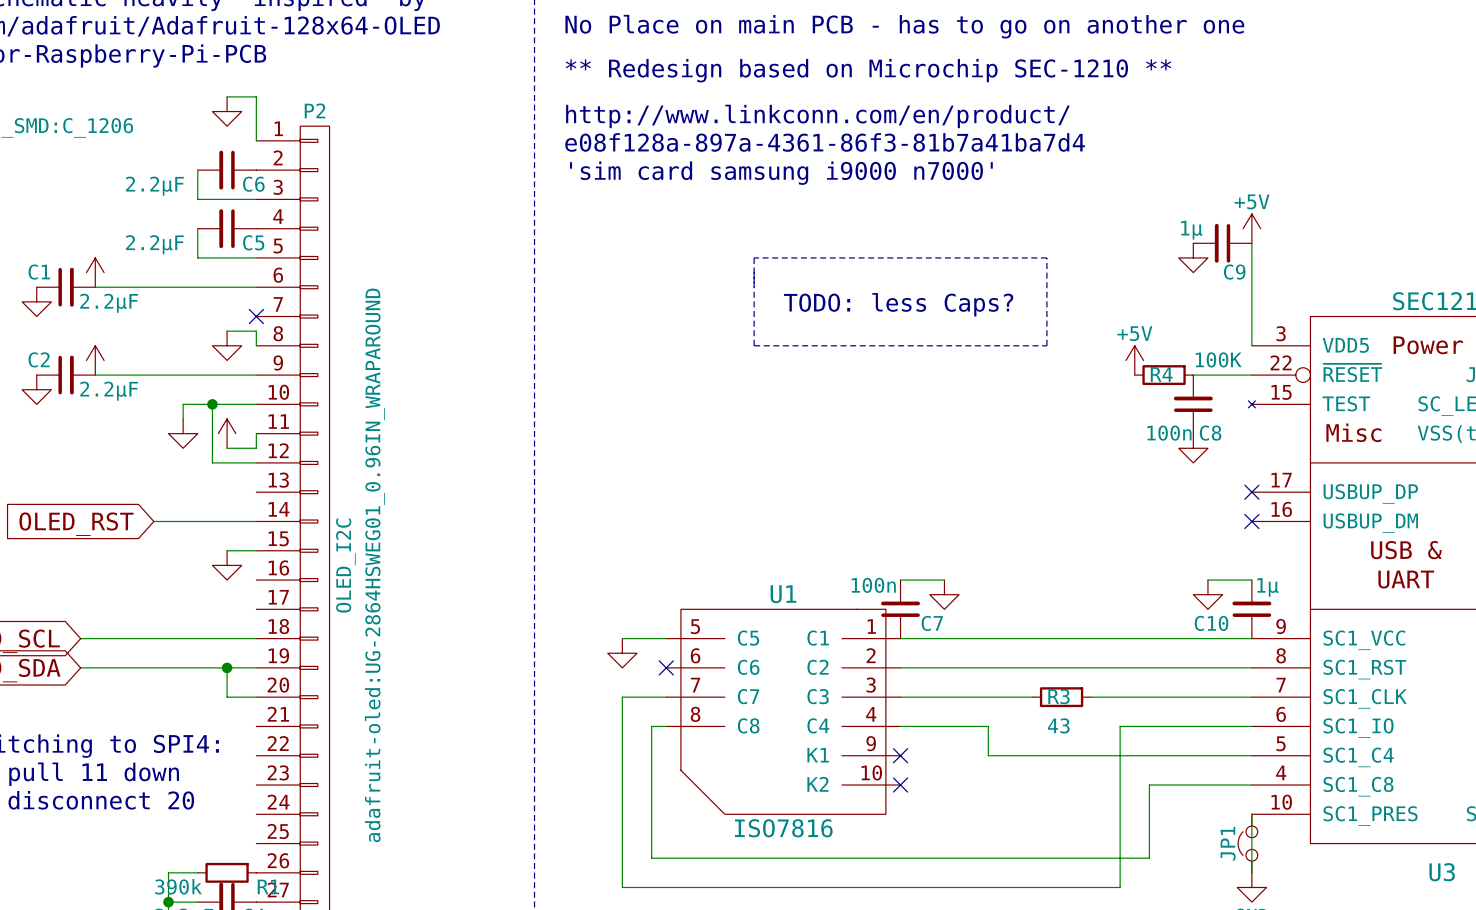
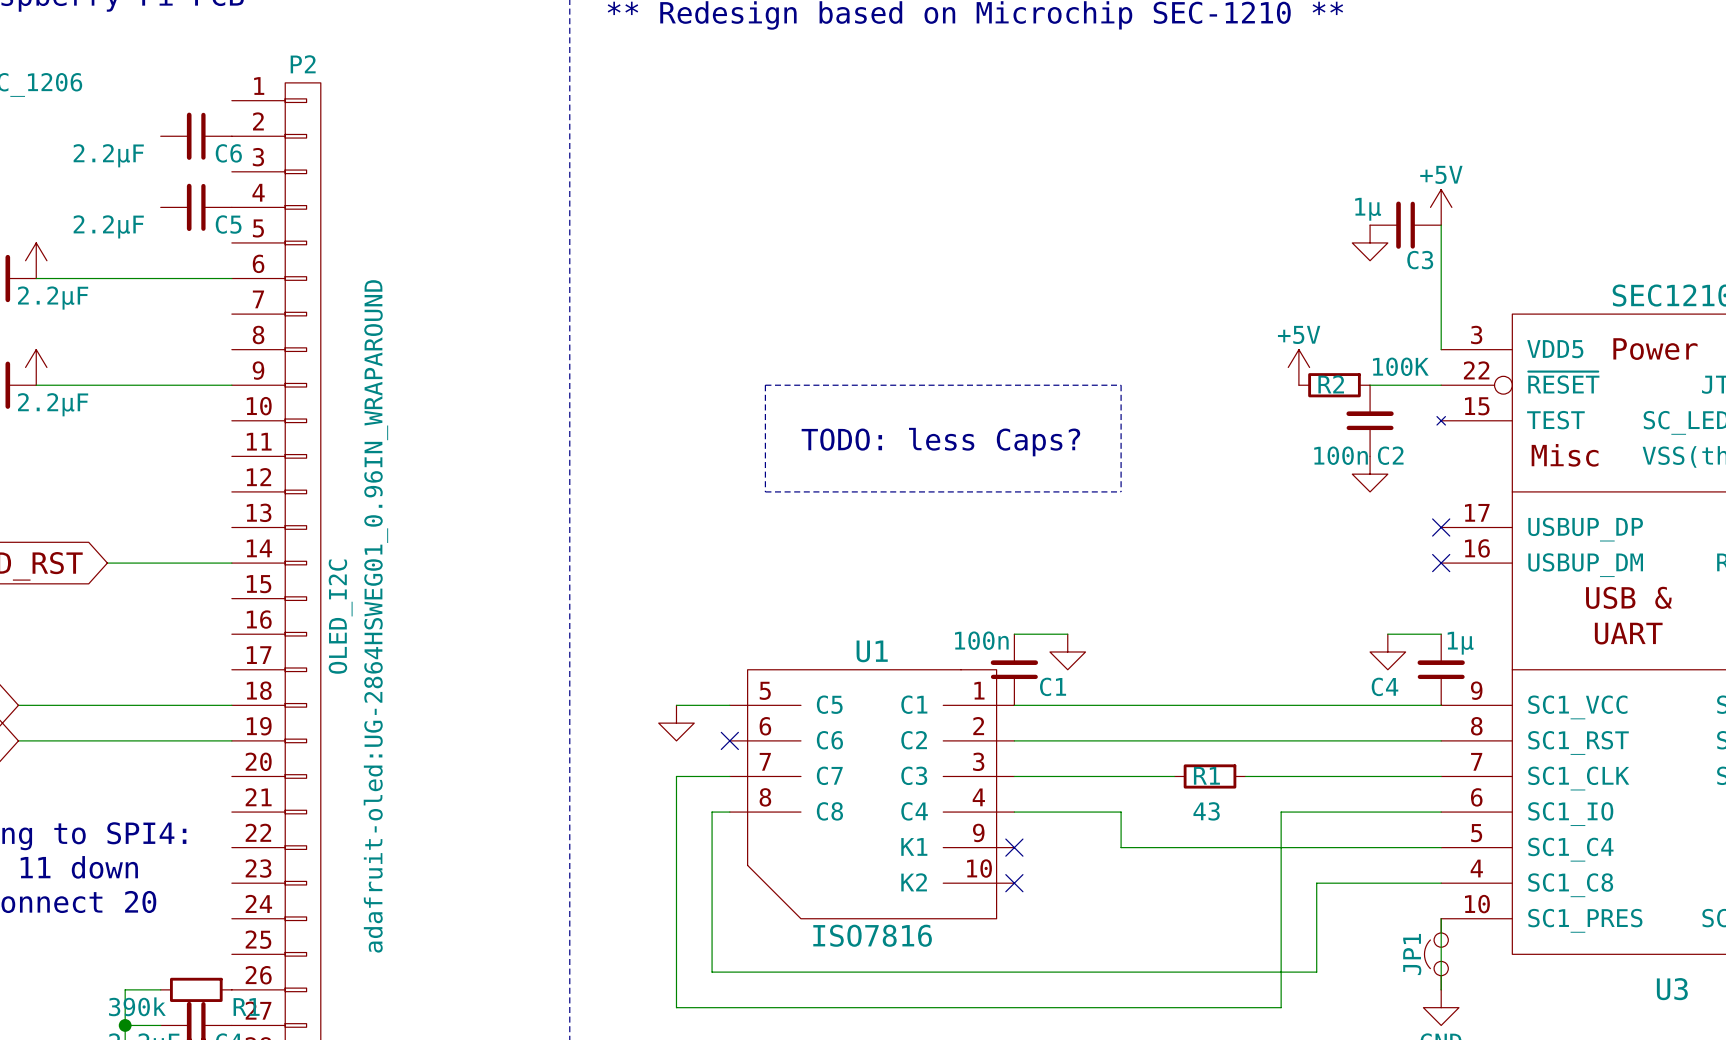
wire: (227, 96) (256, 96) (256, 140) -> none
power symbol: (227, 111) -> none
text: http://www.linkconn.com/en/product/ (817, 116) -> none
text: e08f128a-897a-4361-86f3-81b7a41ba7d4 (825, 142) -> none
wire: (197, 170) (197, 199) (256, 199) -> none
text: 'sim card samsung i9000 n7000' (781, 173) -> none
wire: (197, 228) (197, 257) (256, 257) -> none
line: (754, 257) (754, 345) (1046, 345) (1046, 257) (754, 257) -> (765, 385) (765, 491) (1121, 491) (1121, 385) (765, 385)
C9 name: C9 (1234, 272) -> C3 (1420, 260)
text position: TODO: less Caps? (898, 304) -> TODO: less Caps? (940, 442)
no-connect mark: (256, 316) -> none
wire: (227, 331) (256, 331) (256, 345) -> none
power symbol: (227, 345) -> none
R4 name: R4 (1161, 374) -> R2 (1331, 384)
wire: (212, 404) (212, 462) (256, 462) -> none
junction: (212, 404) -> none
wire: (256, 404) (183, 404) (183, 419) -> none
power symbol: (183, 433) -> none
power symbol: (227, 433) -> none
wire: (256, 433) (256, 448) (227, 448) -> none
C8 name: C8 (1210, 433) -> C2 (1390, 455)
wire: (227, 550) (256, 550) -> none
power symbol: (227, 565) -> none
C7 name: C7 (932, 623) -> C1 (1053, 686)
C10 name: C10 (1211, 623) -> C4 (1384, 686)
wire: (227, 667) (227, 697) (256, 697) -> none
junction: (227, 667) -> none
R3 name: R3 (1058, 696) -> R1 (1206, 775)

